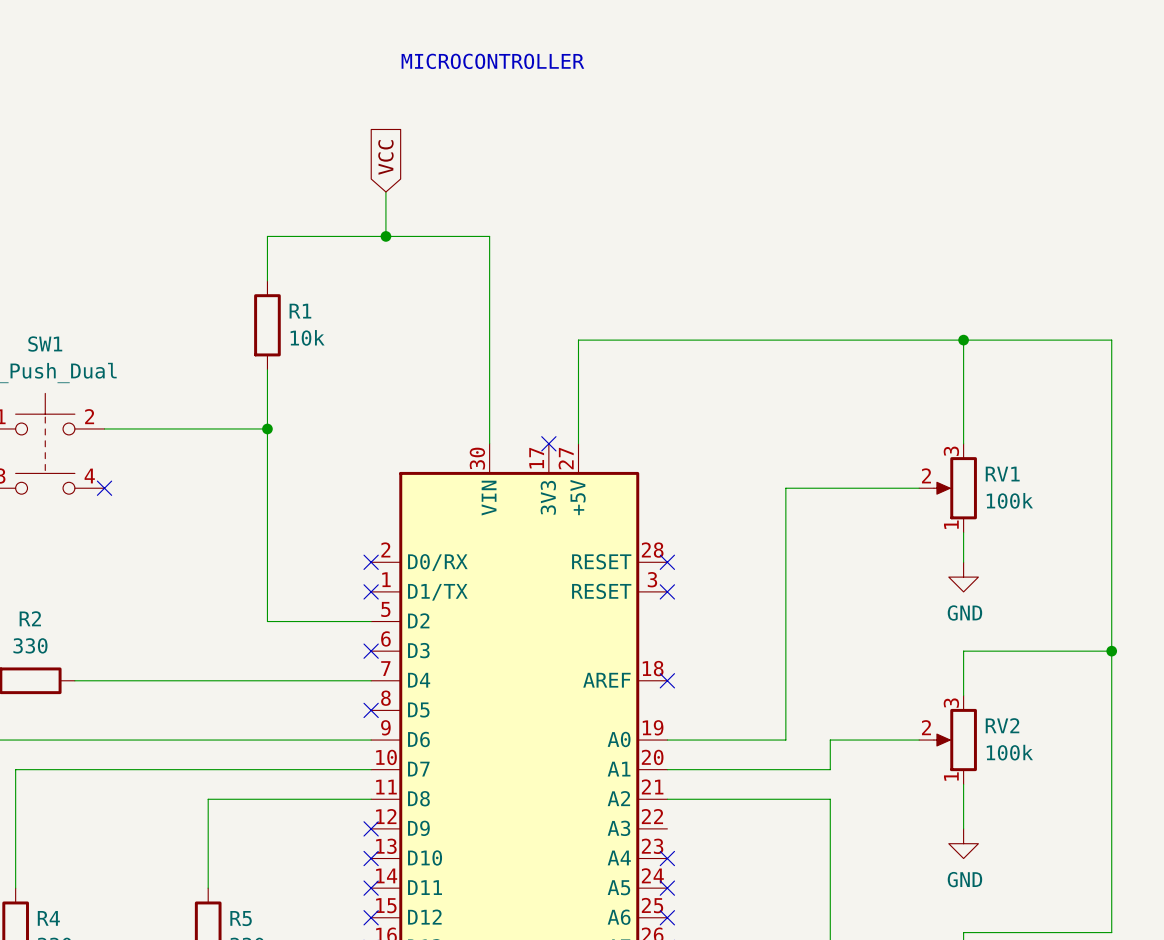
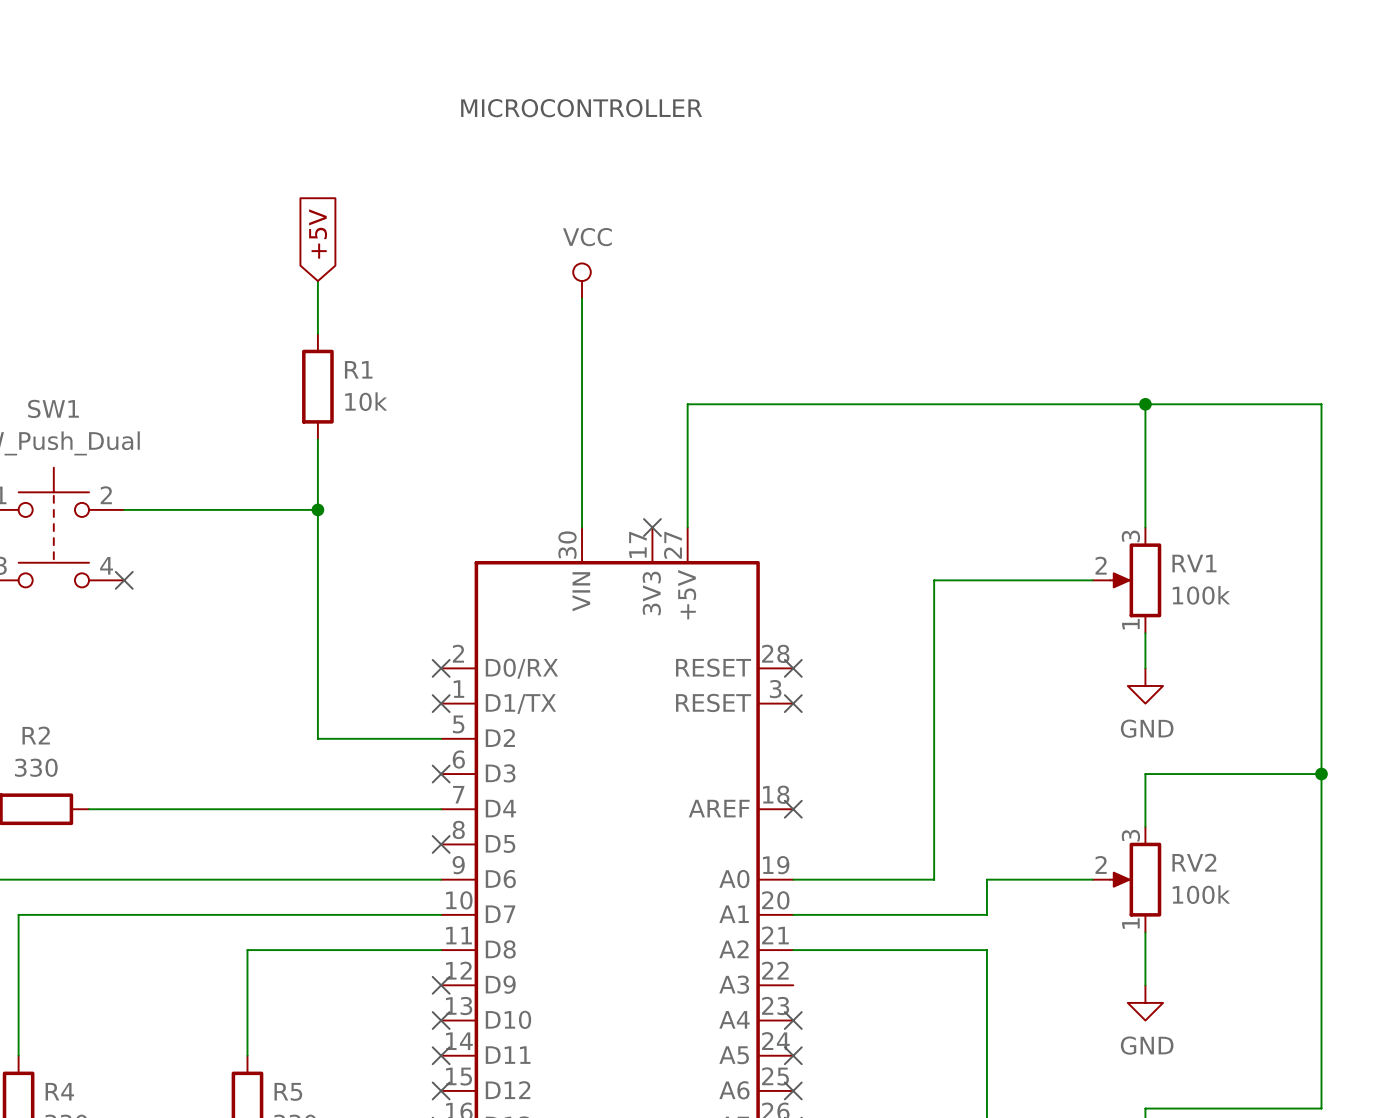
text position: MICROCONTROLLER (492, 61) -> MICROCONTROLLER (581, 108)
global label: VCC (385, 157) -> none
wire: (385, 191) (385, 236) -> none
global label: none -> +5V (318, 233)
wire: (267, 236) (489, 236) (489, 251) -> none
junction: (385, 236) -> none
power symbol: none -> VCC (582, 281)

